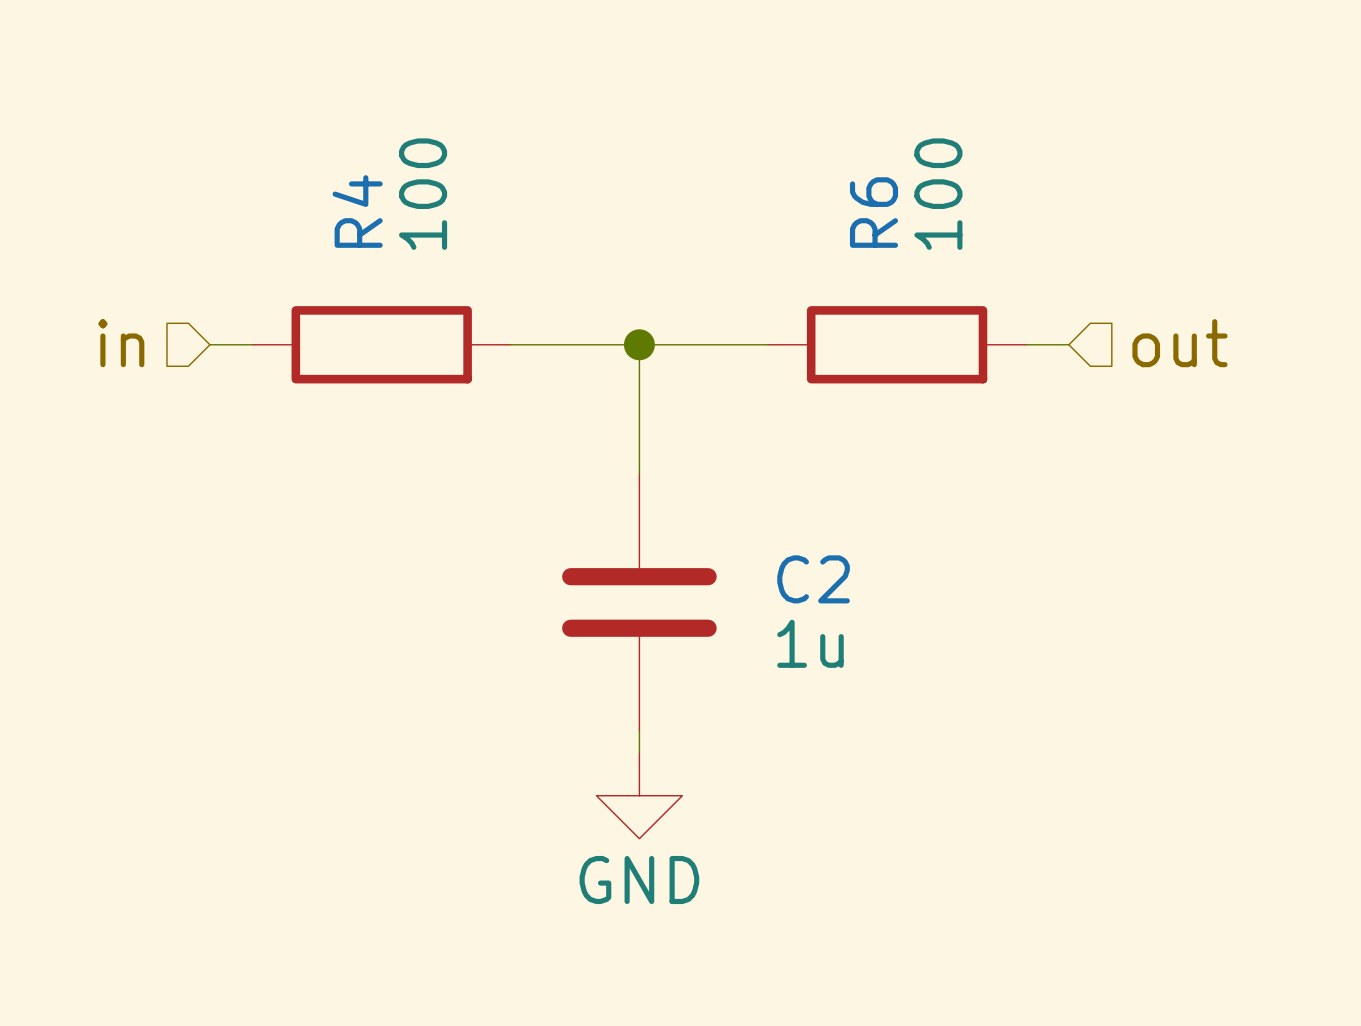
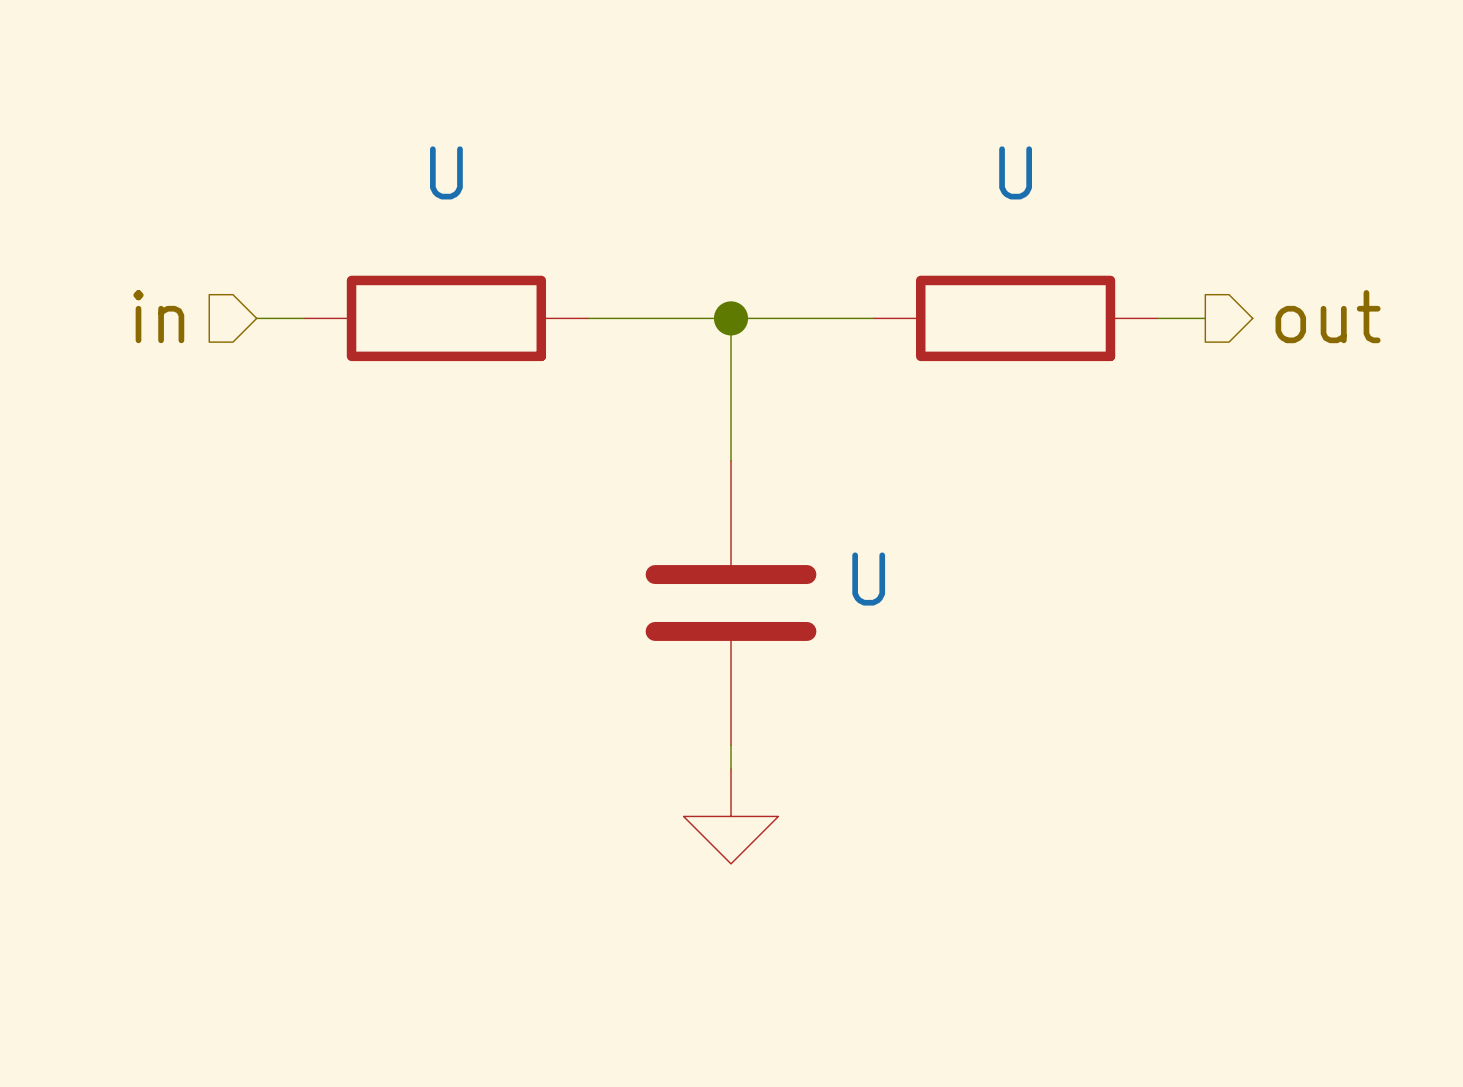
R4 value: 100 (423, 194) -> none
R6 value: 100 (938, 194) -> none
R4 name: R4 (357, 211) -> U (446, 172)
R6 name: R6 (874, 212) -> U (1015, 172)
hierarchical label shape: input (1179, 343) -> output (1328, 316)
C2 name: C2 (813, 579) -> U (868, 579)
C2 value: 1u (810, 643) -> none
power symbol text: GND (639, 880) -> none

